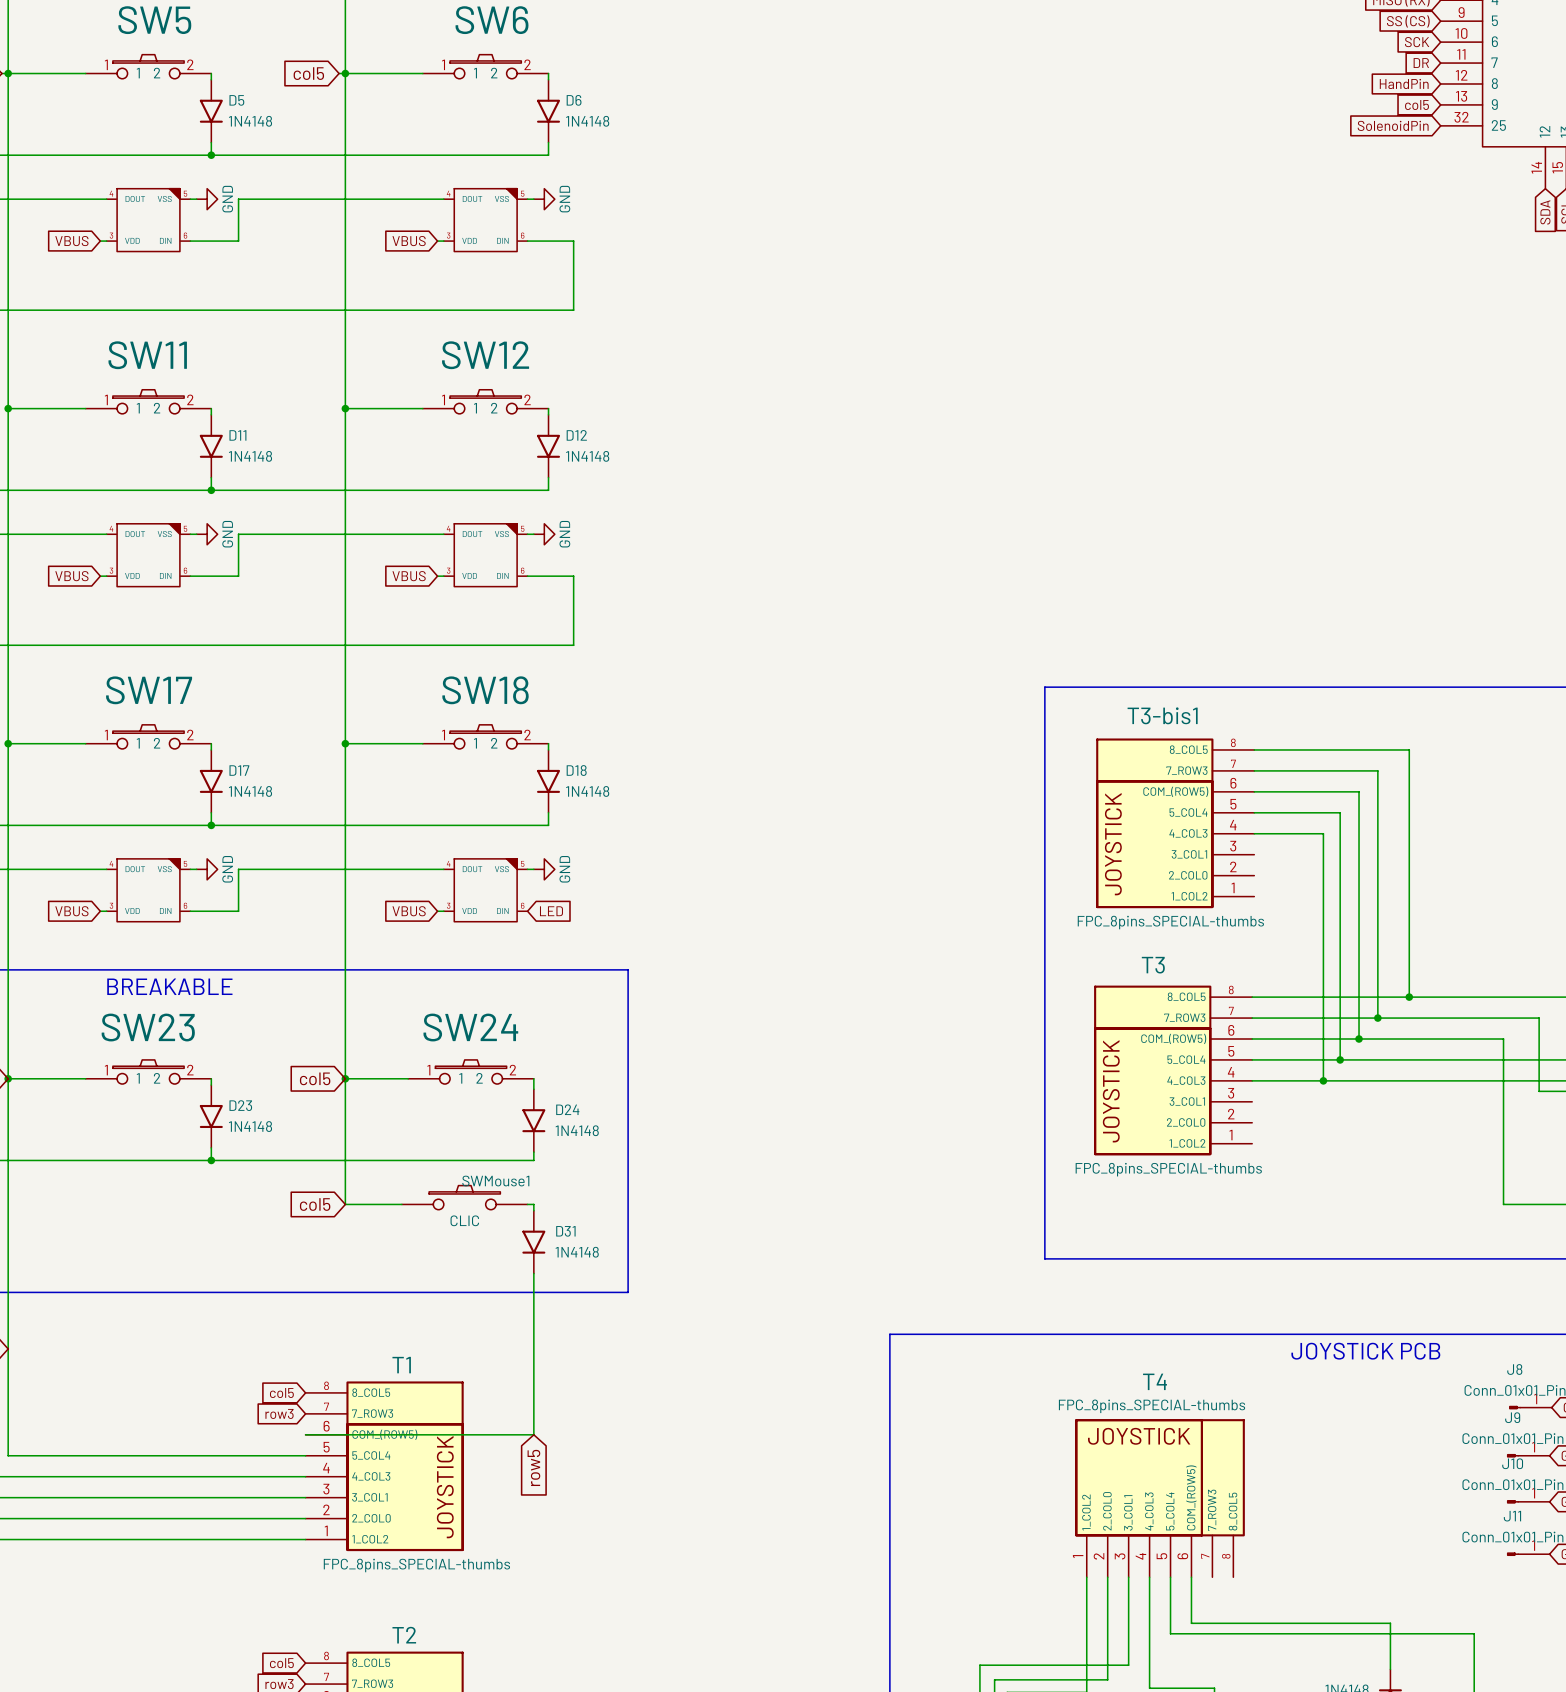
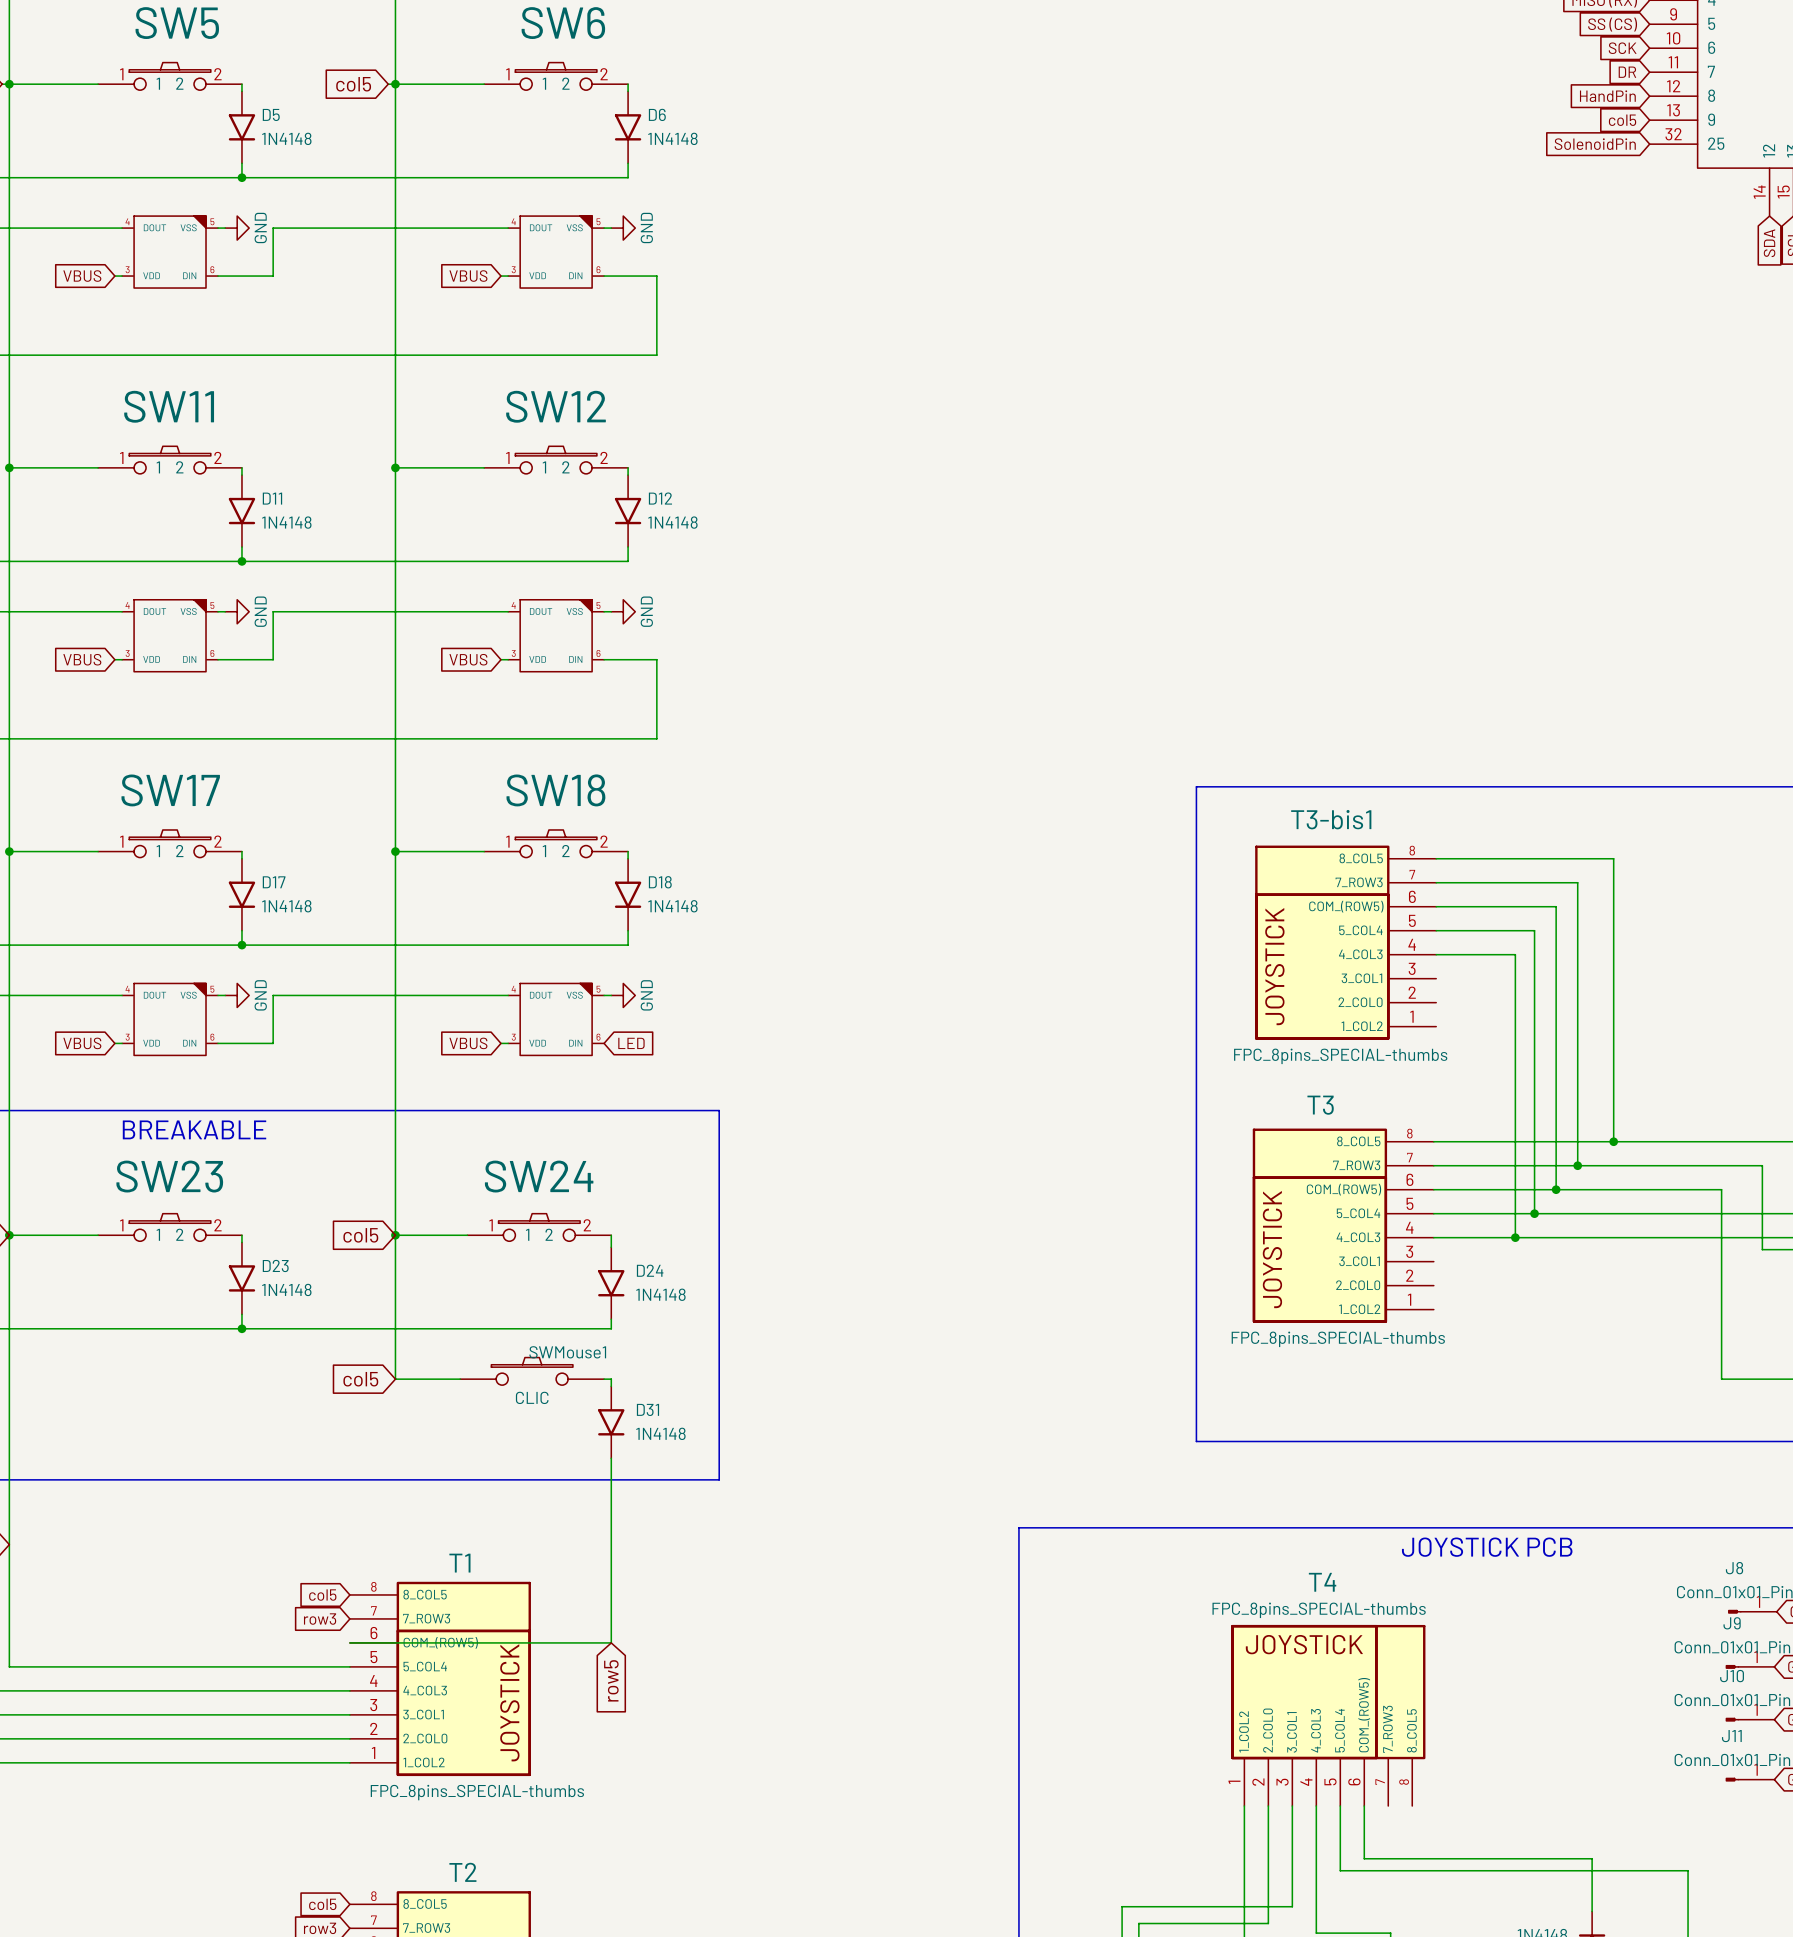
text position: JOYSTICK PCB (1365, 1351) -> JOYSTICK PCB (1487, 1547)

